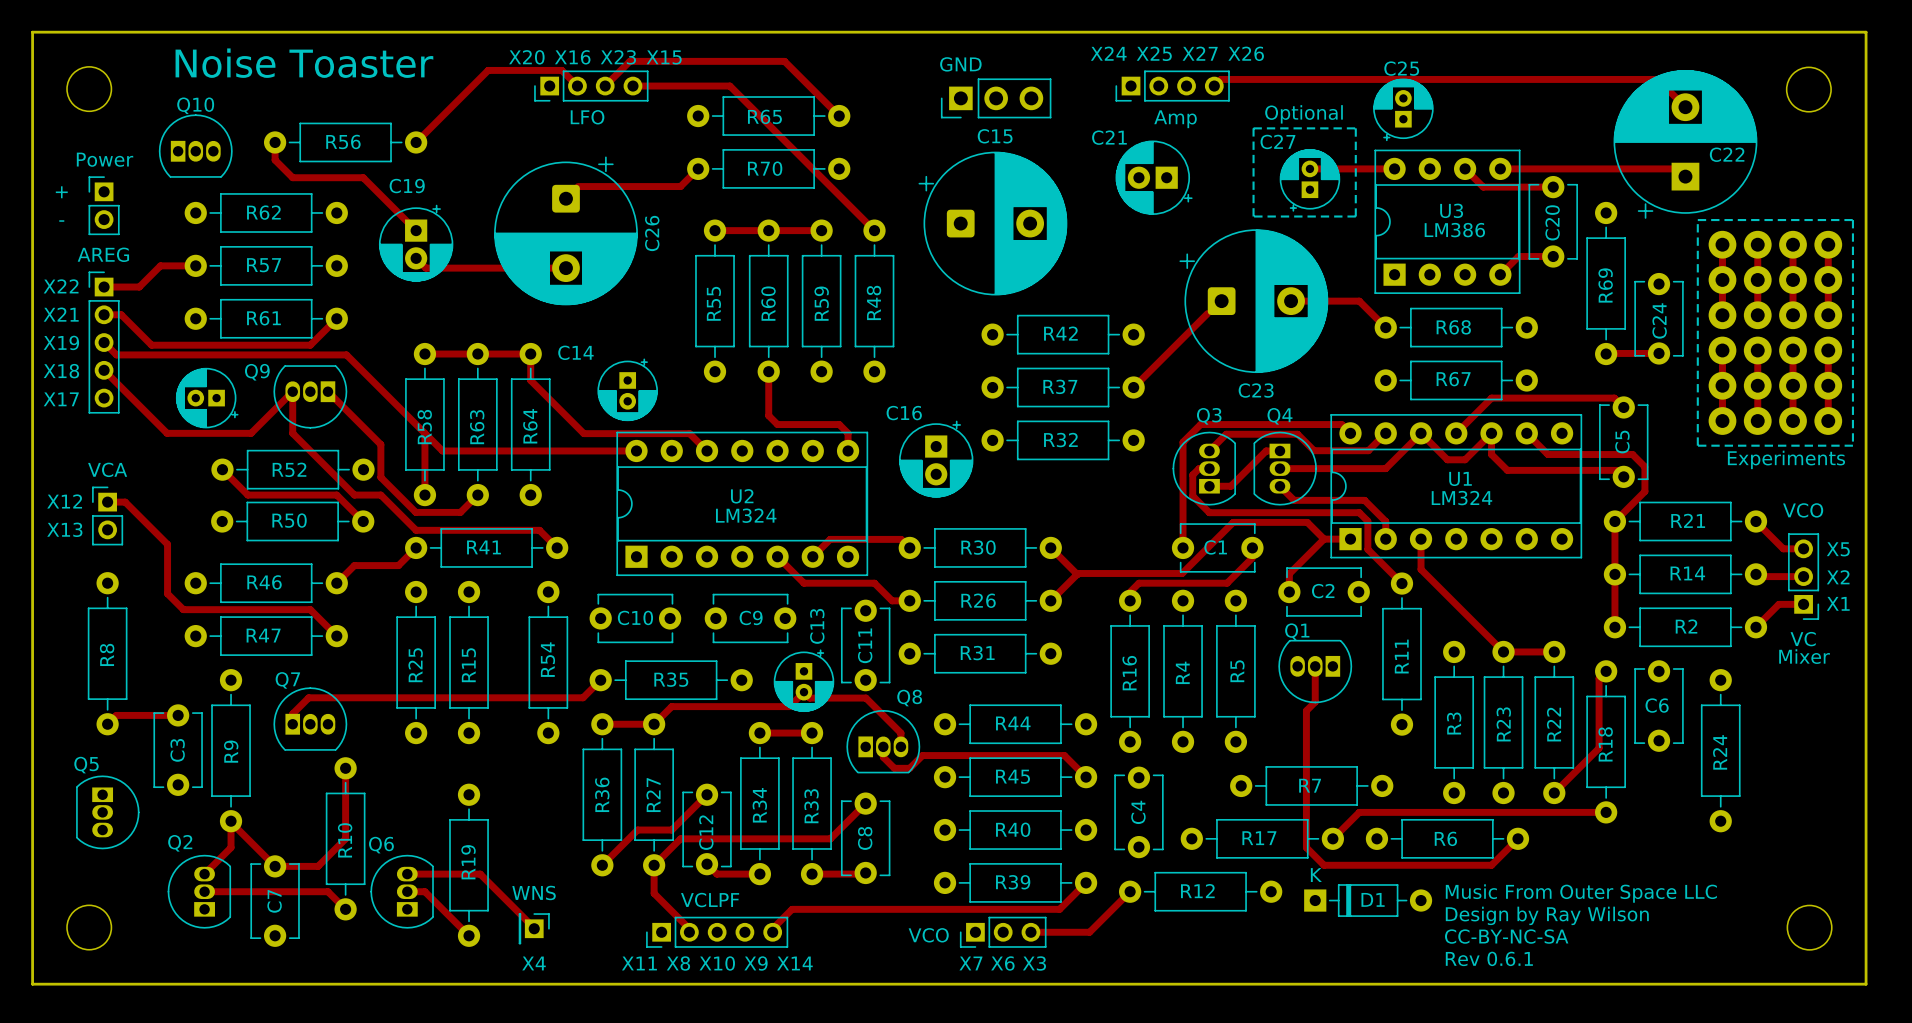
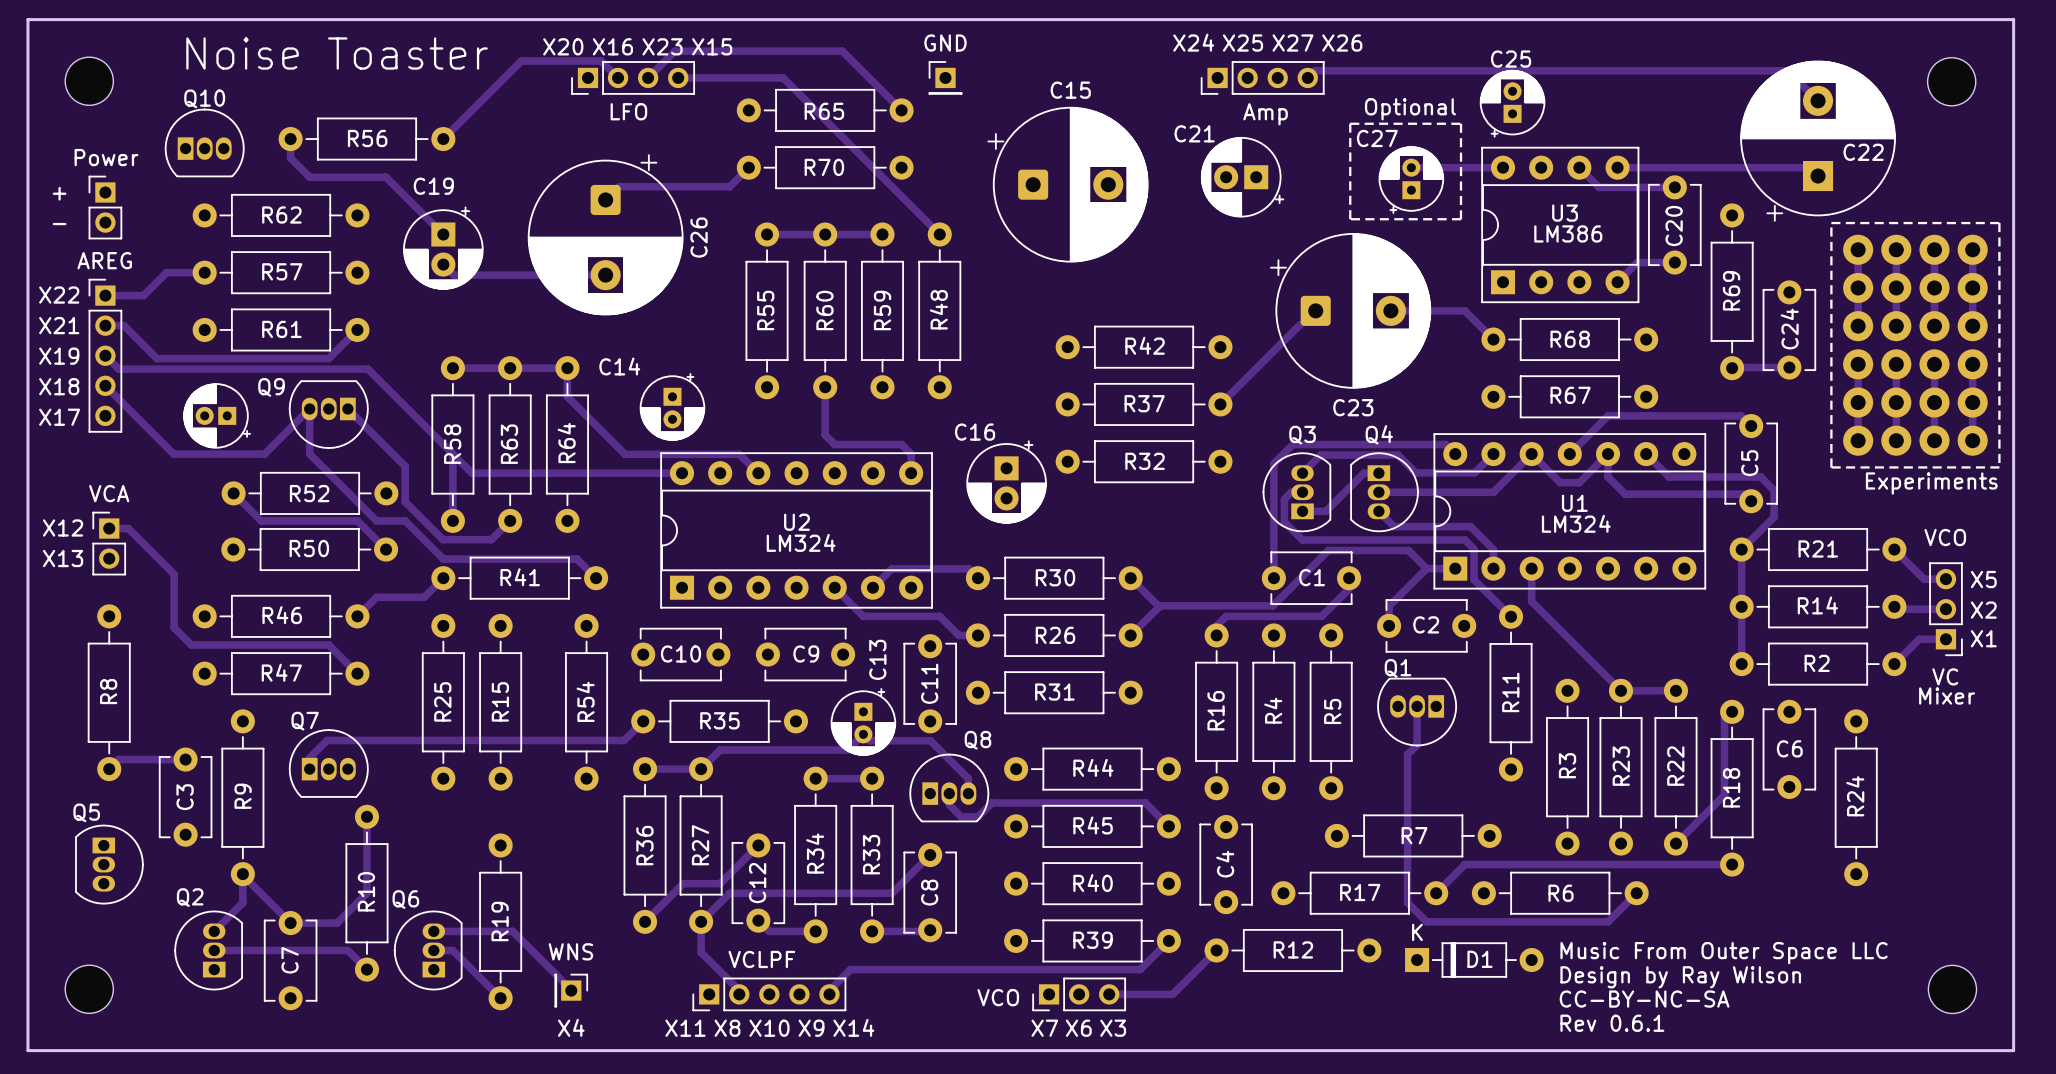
part: none -> GND (945, 77)
GND: (996, 98) -> none
C15 position: (992, 223) -> (1068, 184)

